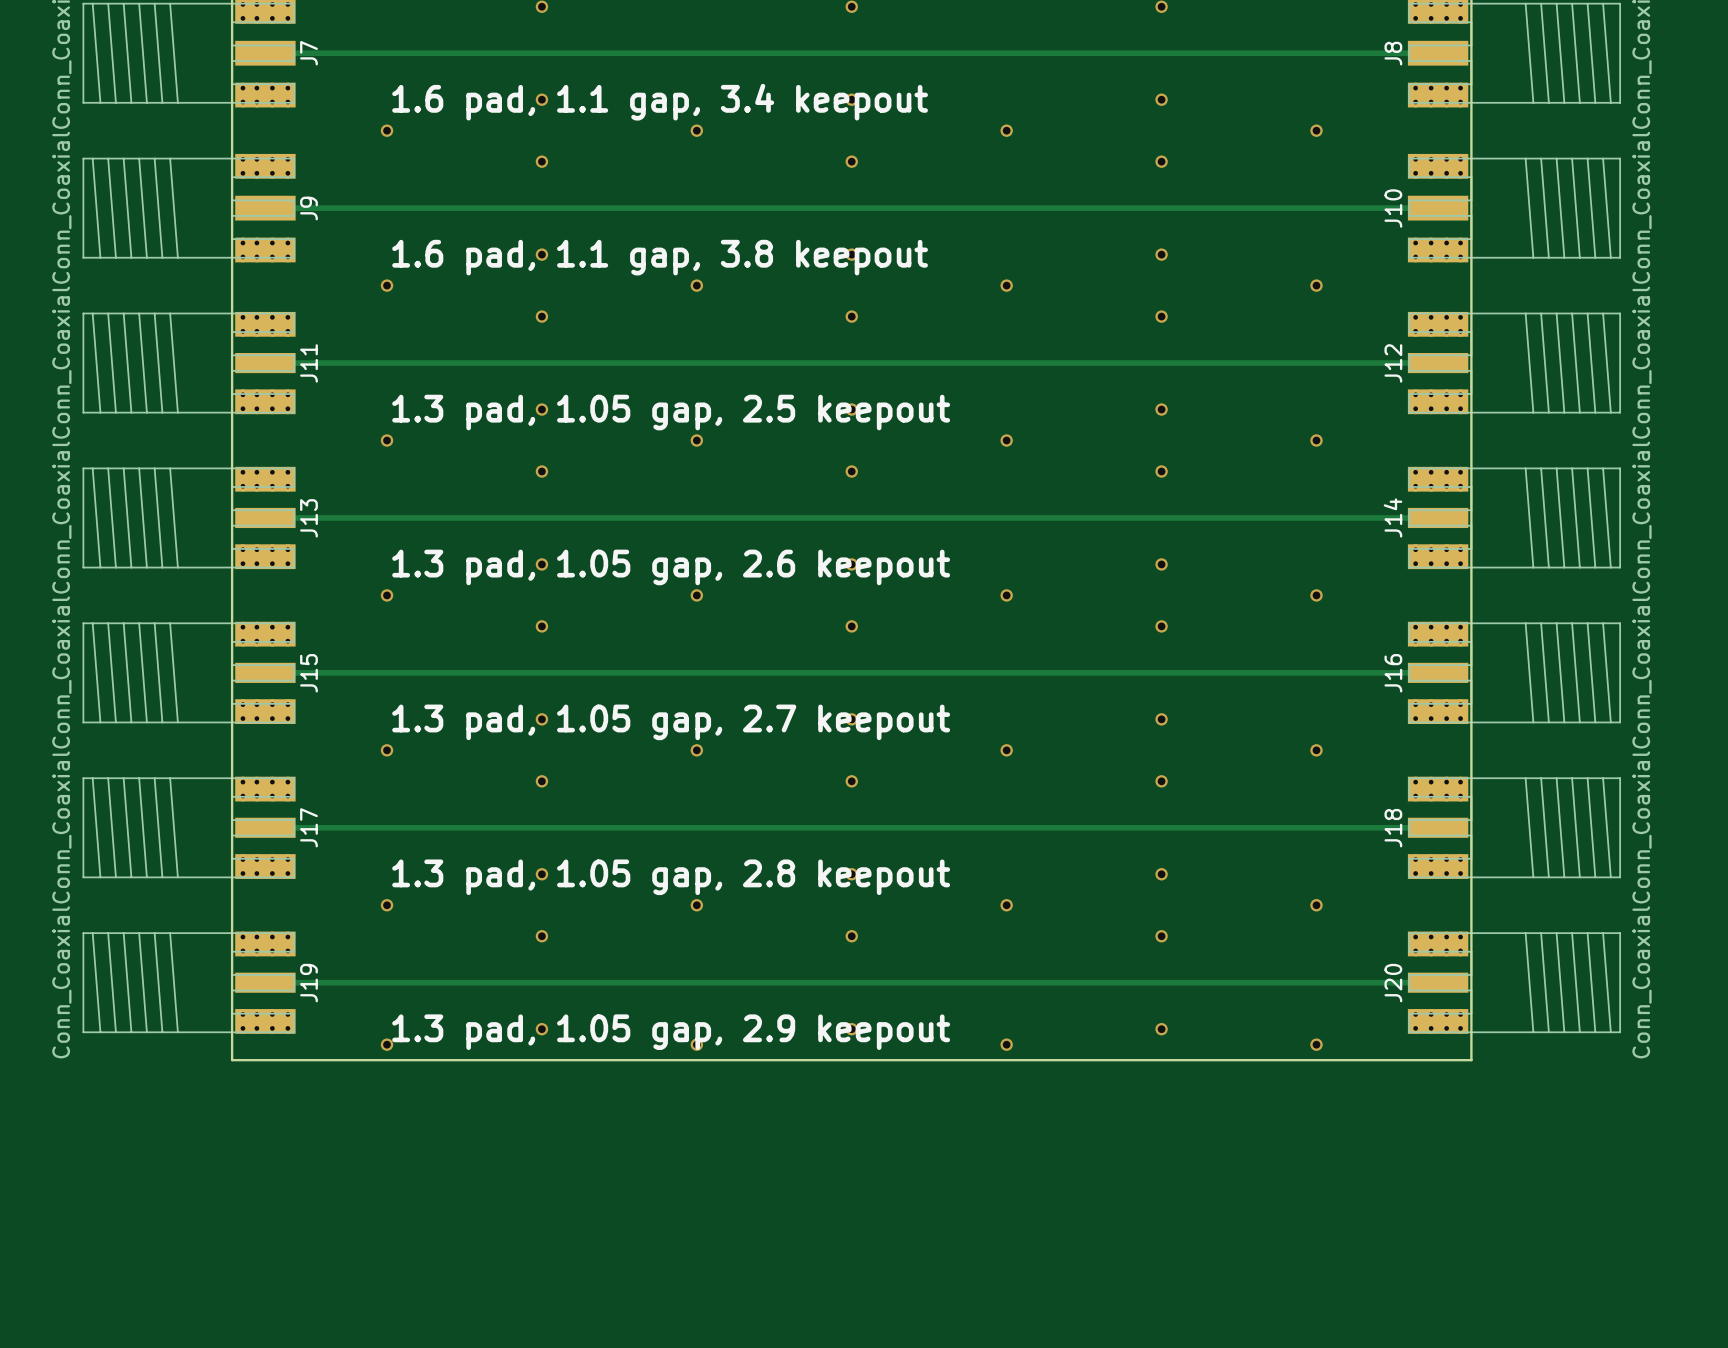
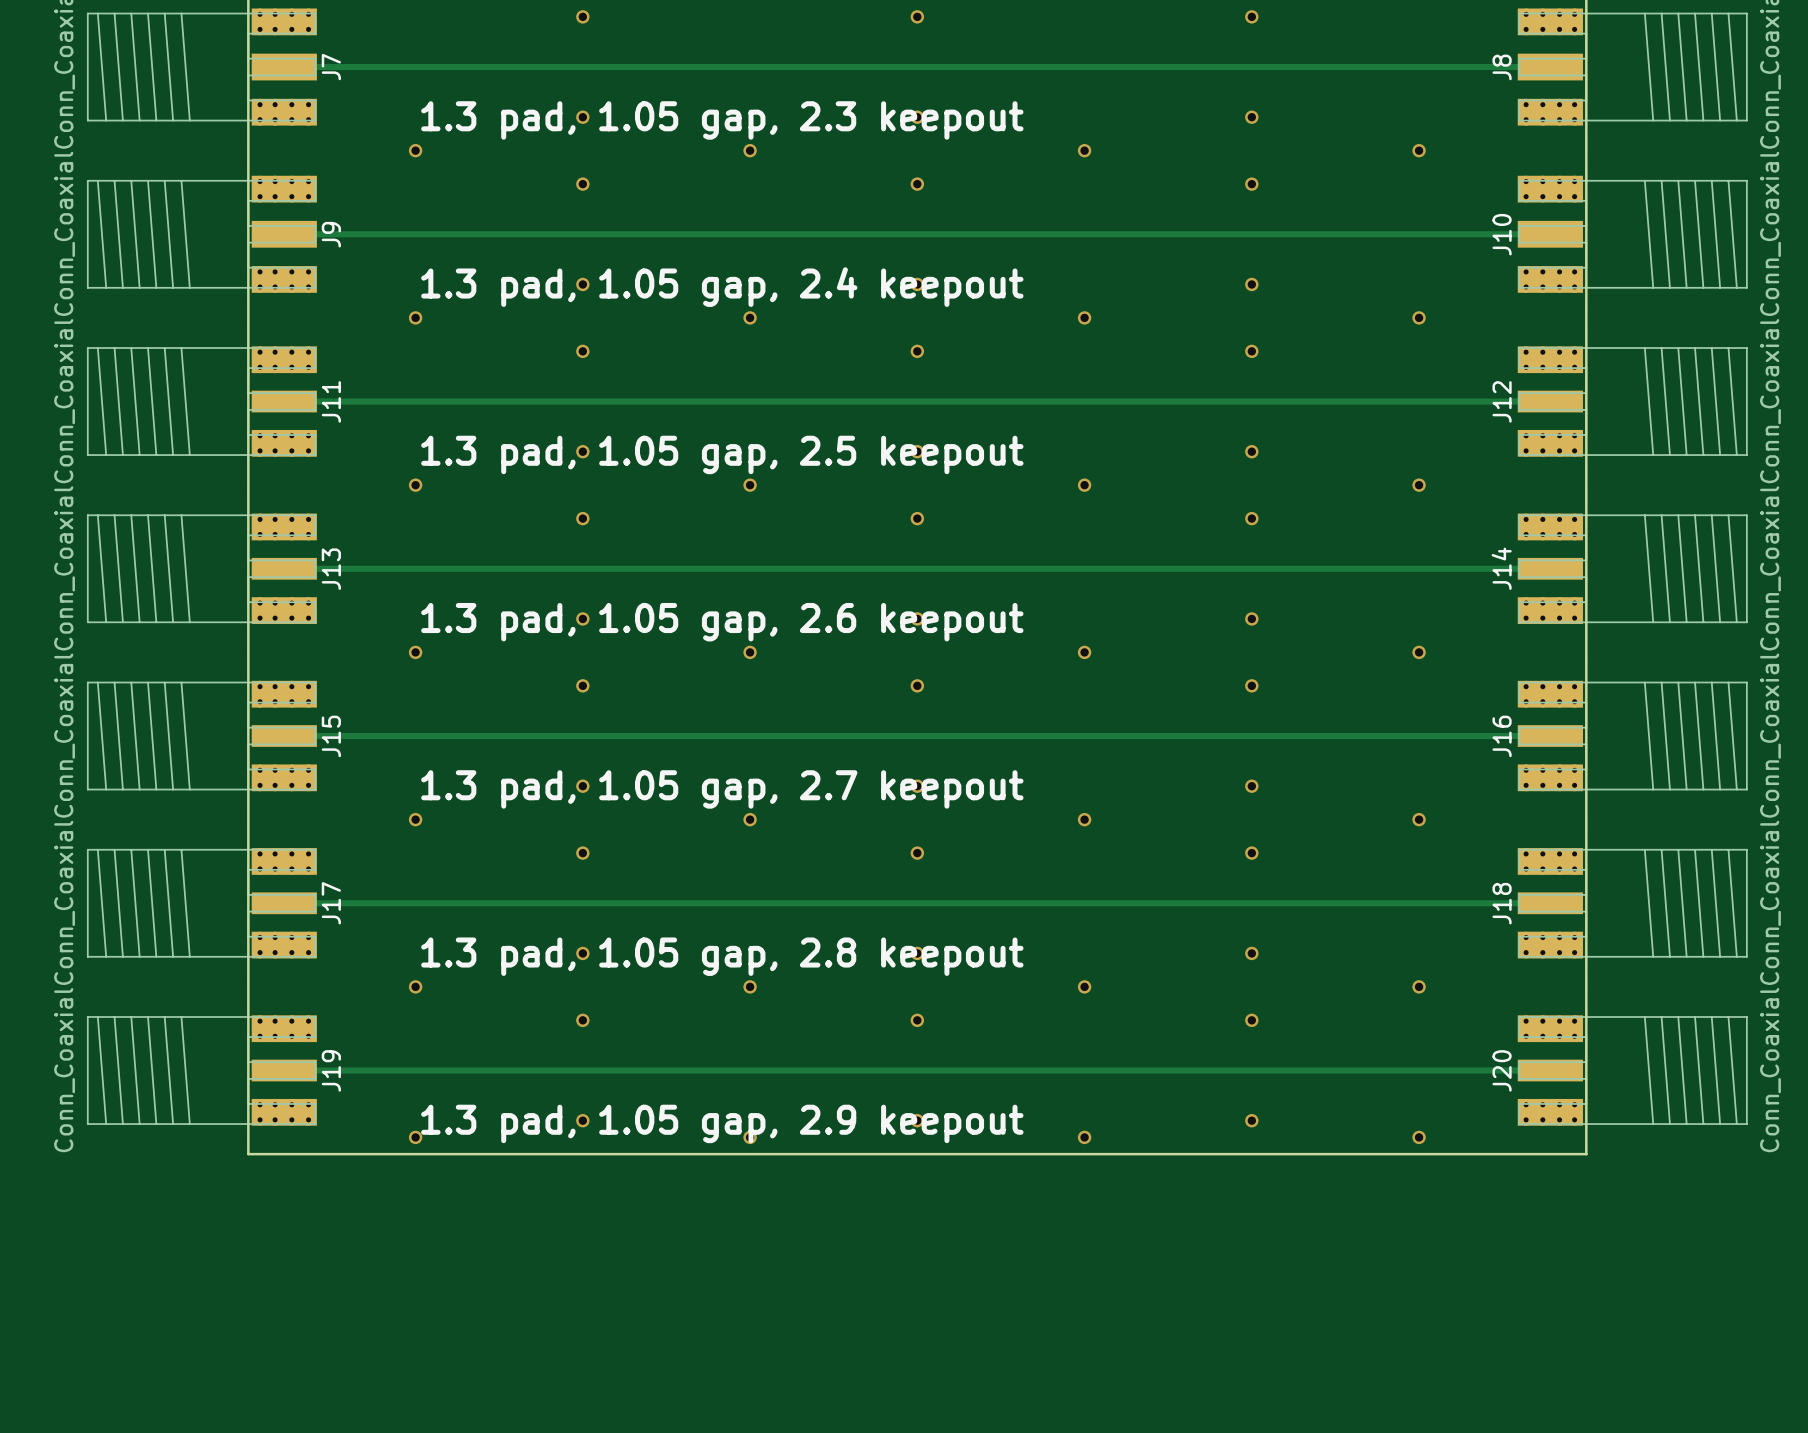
text: 1.6 pad, 1.1 gap, 3.4 keepout (660, 102) -> 1.3 pad, 1.05 gap, 2.3 keepout (722, 120)
text: 1.6 pad, 1.1 gap, 3.8 keepout (660, 257) -> 1.3 pad, 1.05 gap, 2.4 keepout (722, 287)

